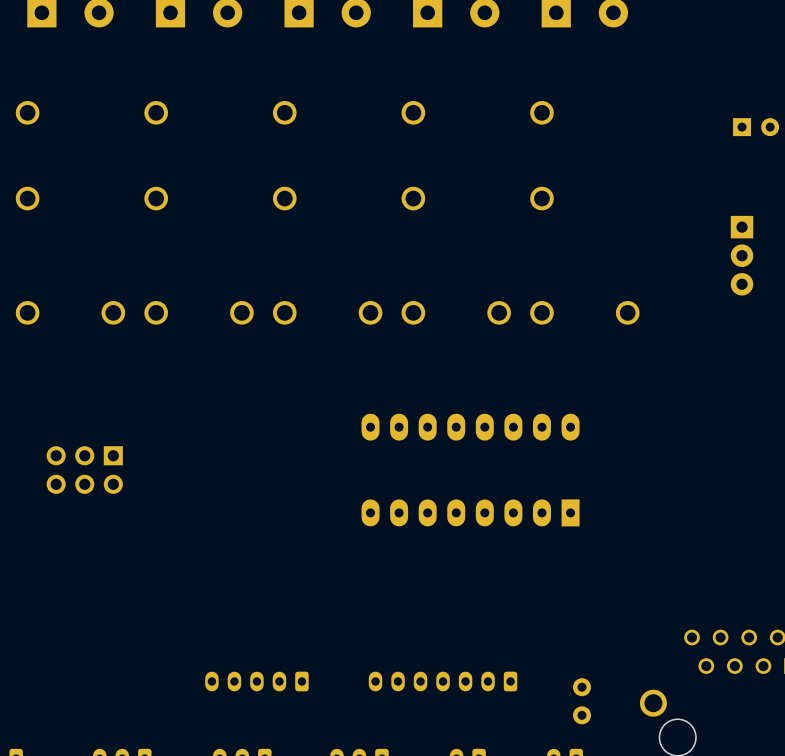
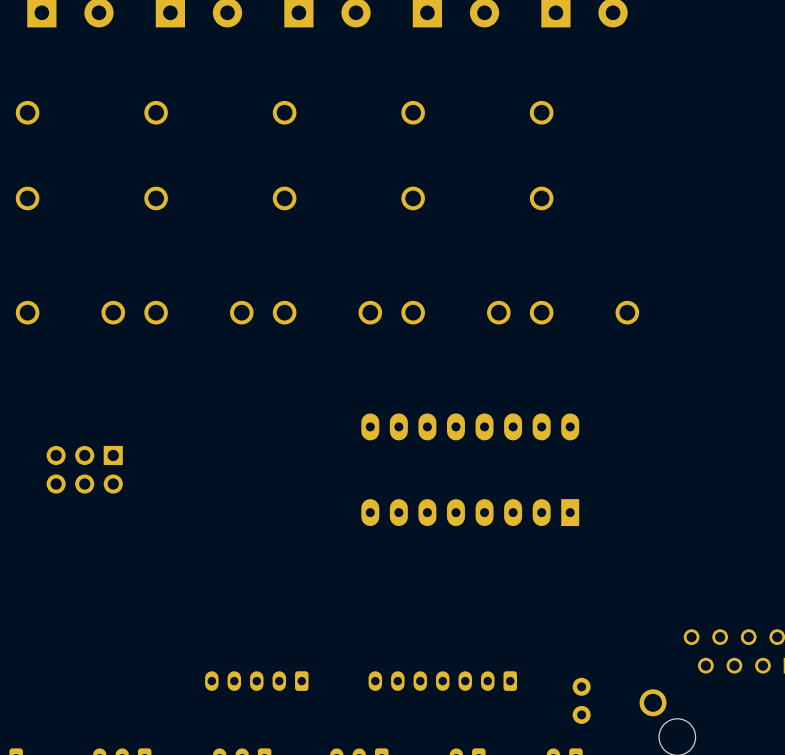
part: (756, 127) -> none
part: (742, 255) -> none

